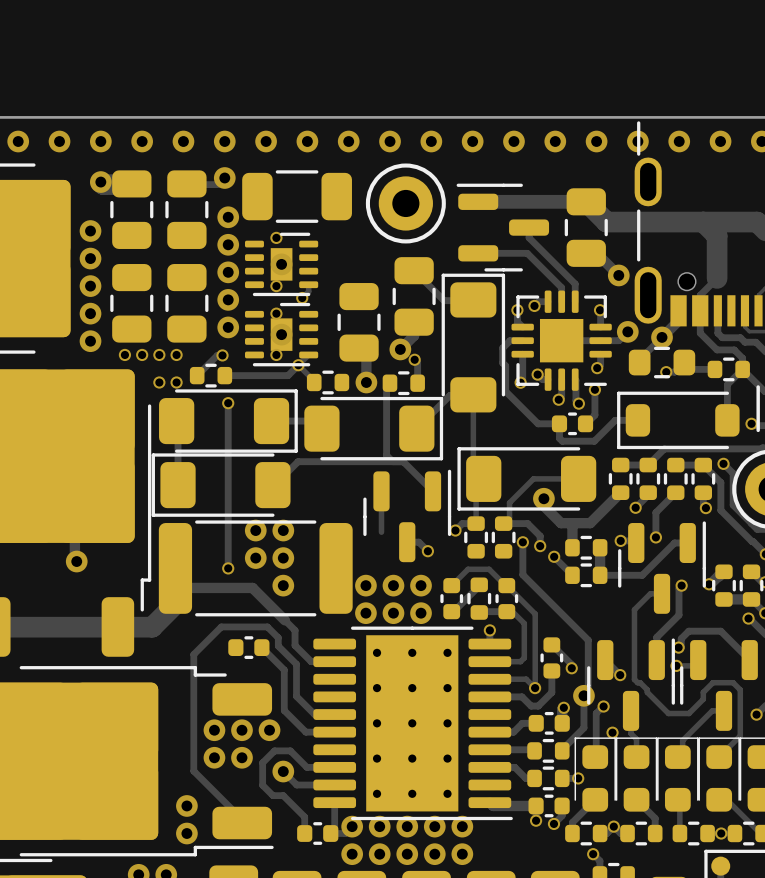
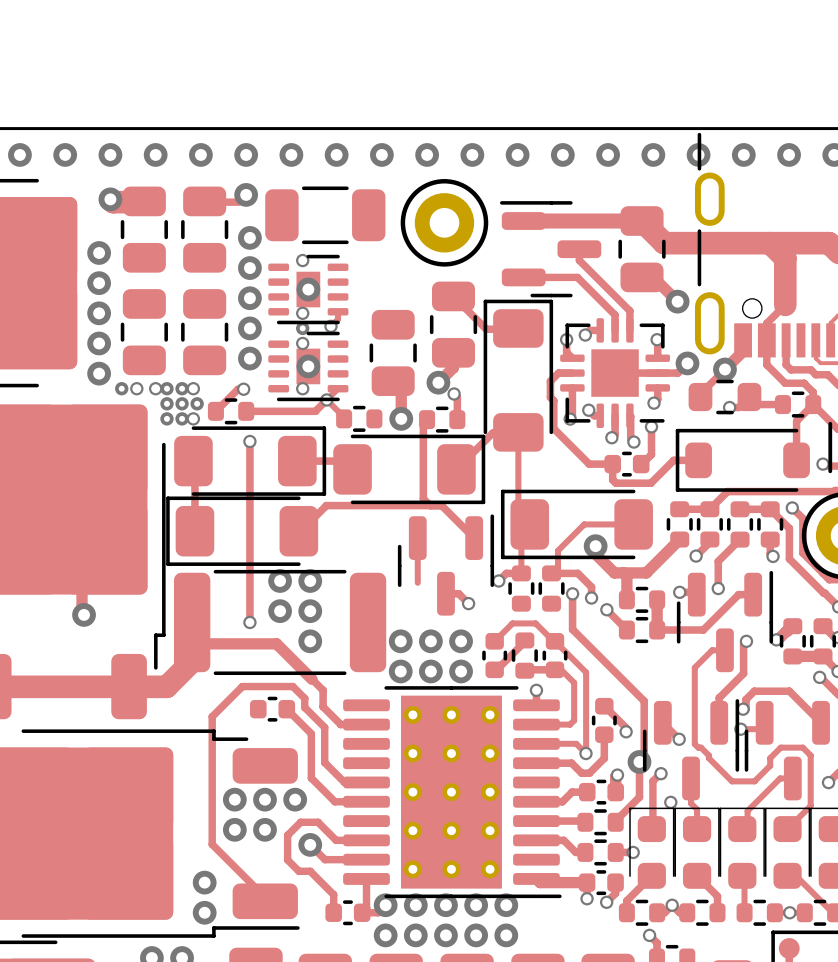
via: none -> (302, 328)
via: none -> (121, 388)
via: none -> (166, 388)
via: (159, 354) -> none
via: none -> (182, 388)
via: none -> (166, 403)
via: none -> (182, 403)
via: none -> (197, 403)
via: none -> (166, 418)
via: (159, 382) -> none
via: none -> (182, 418)

